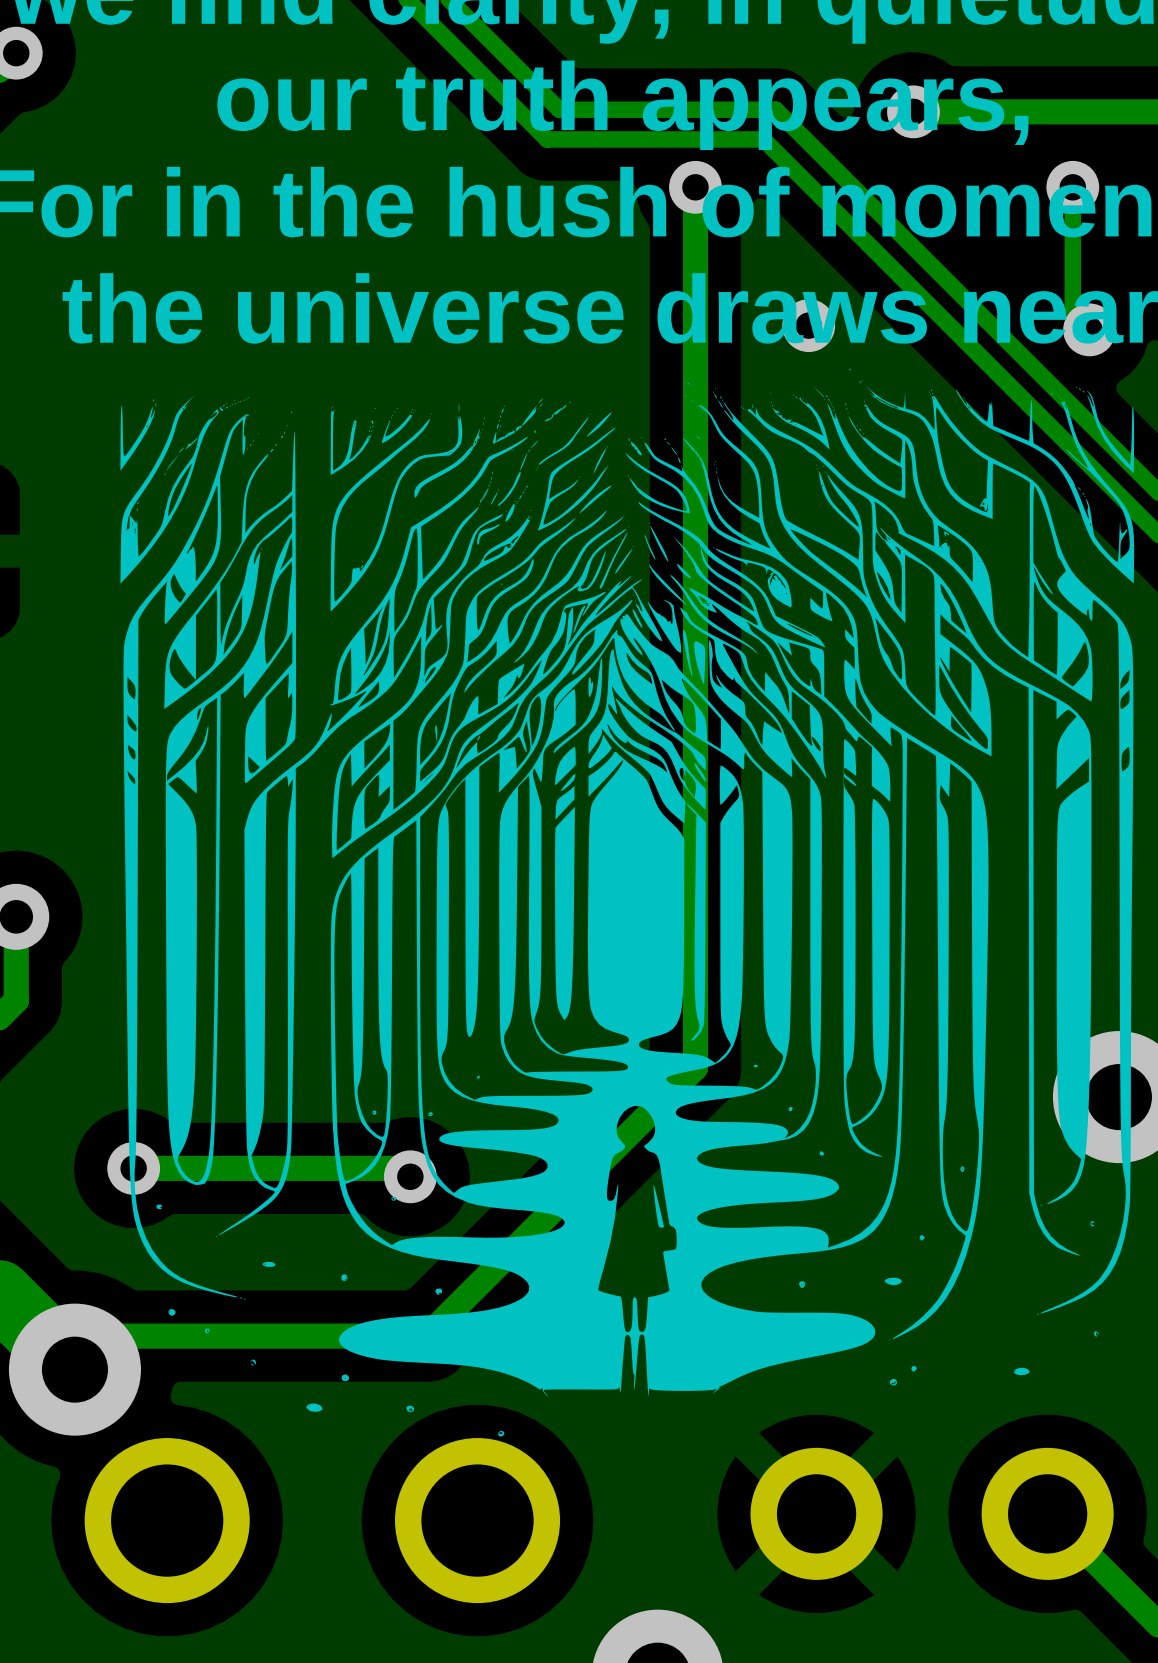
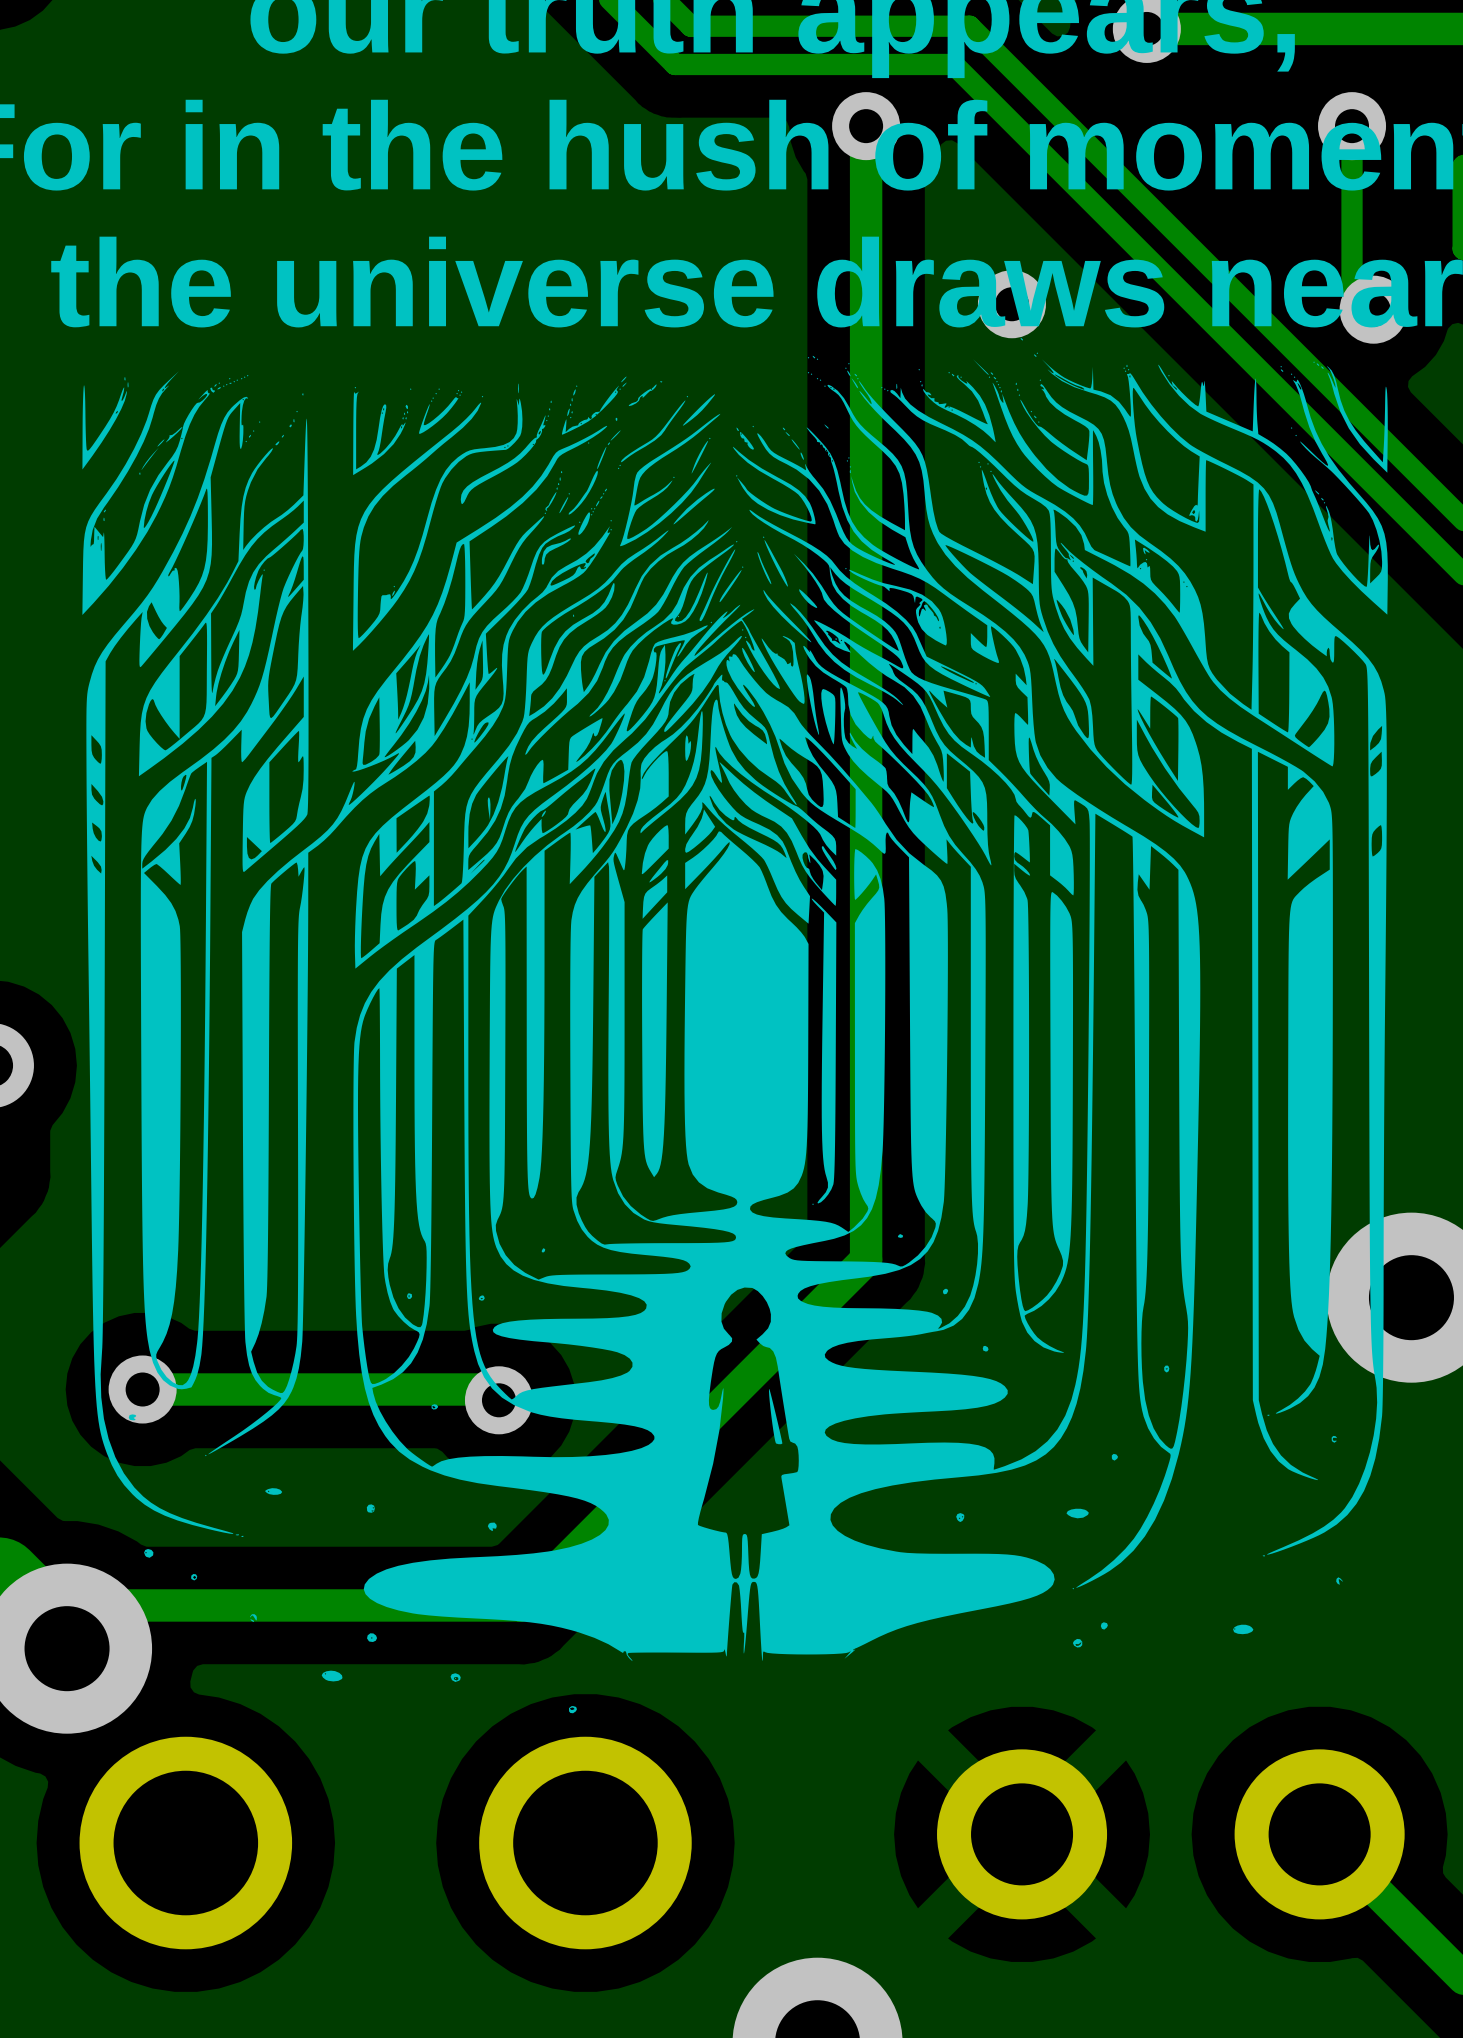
drawing position: (627, 902) -> (735, 1025)

